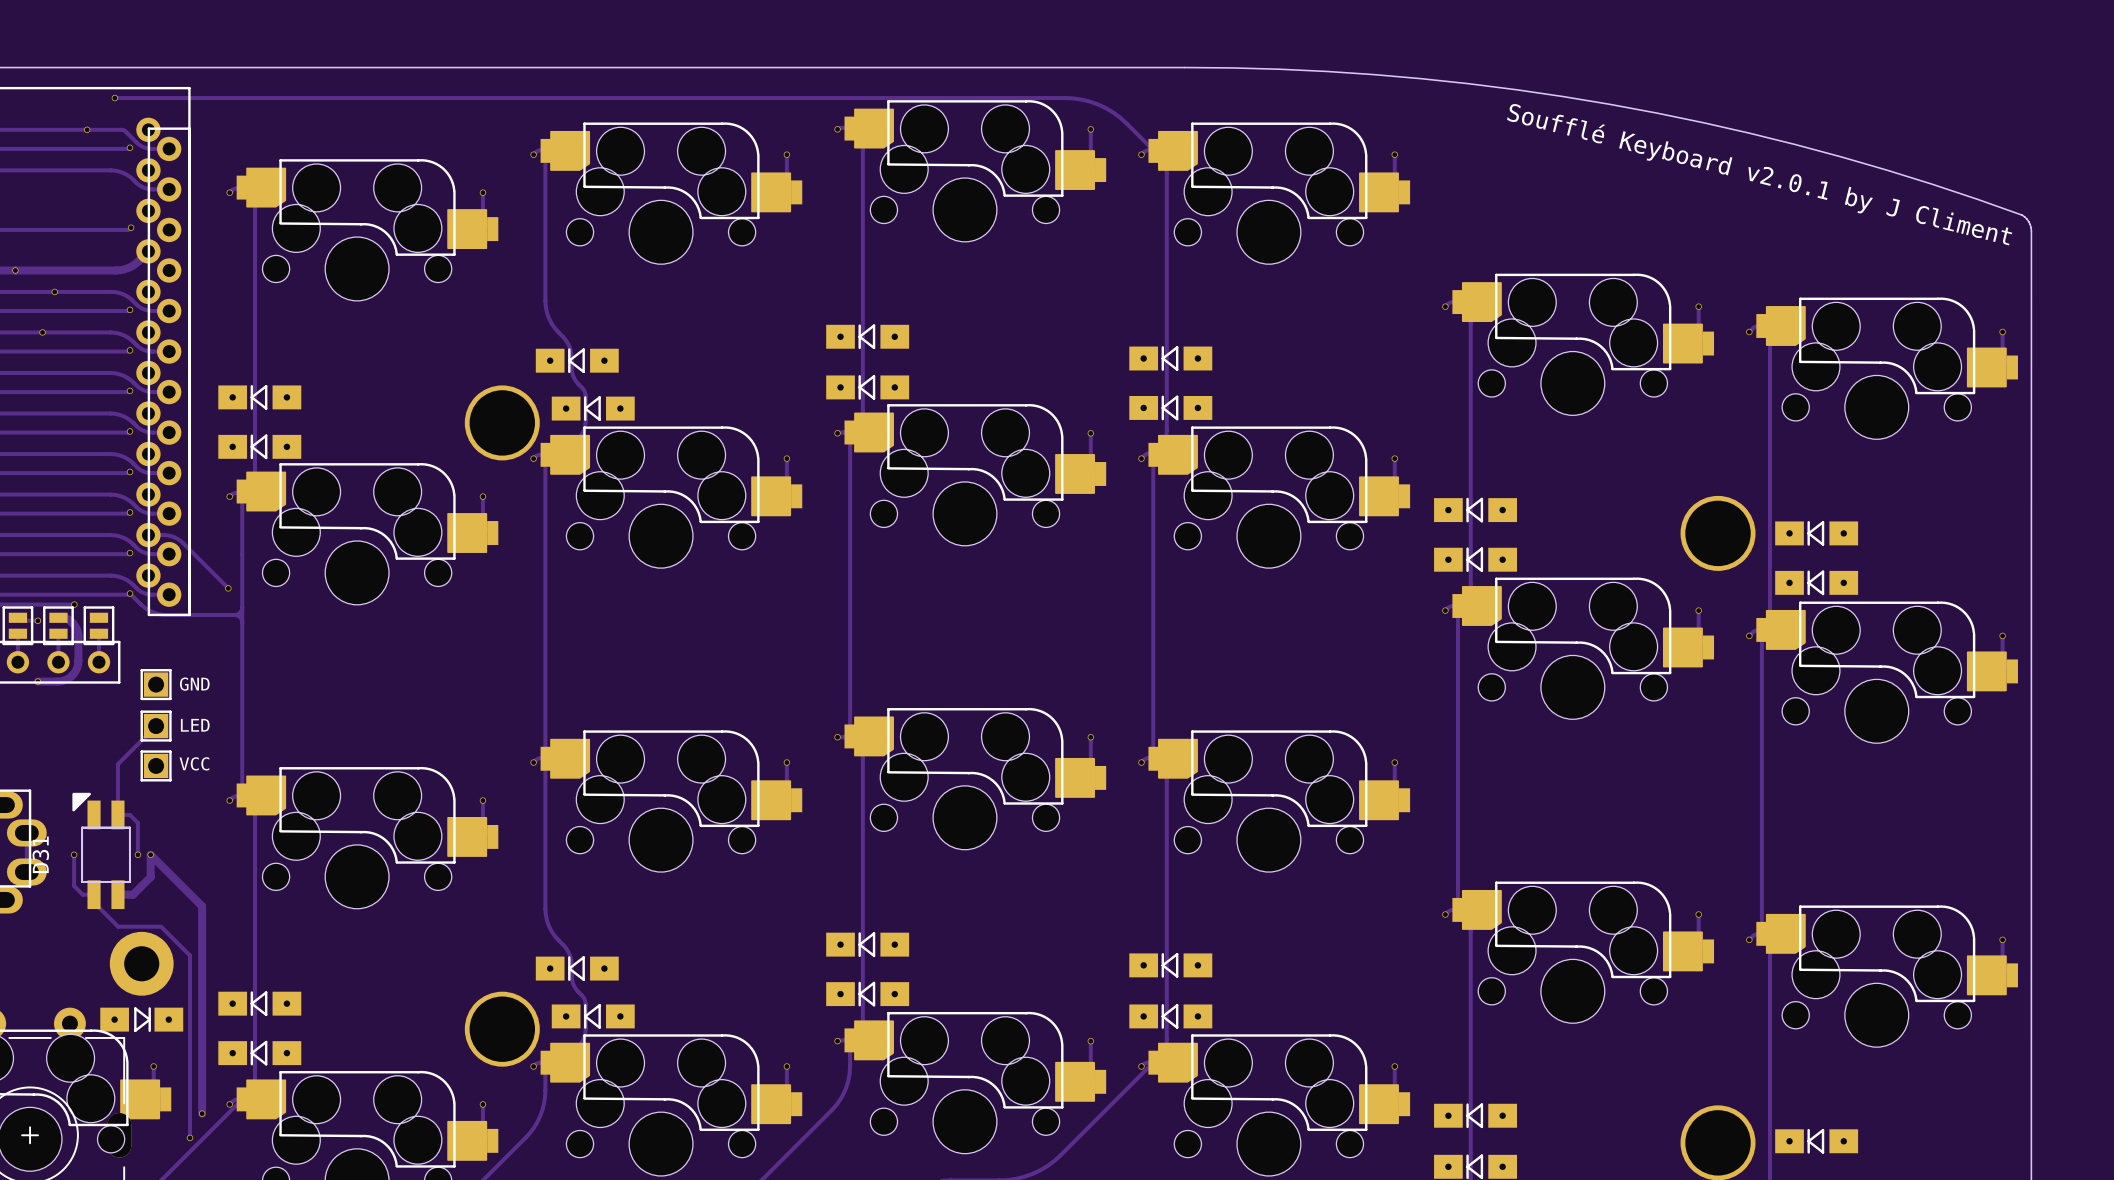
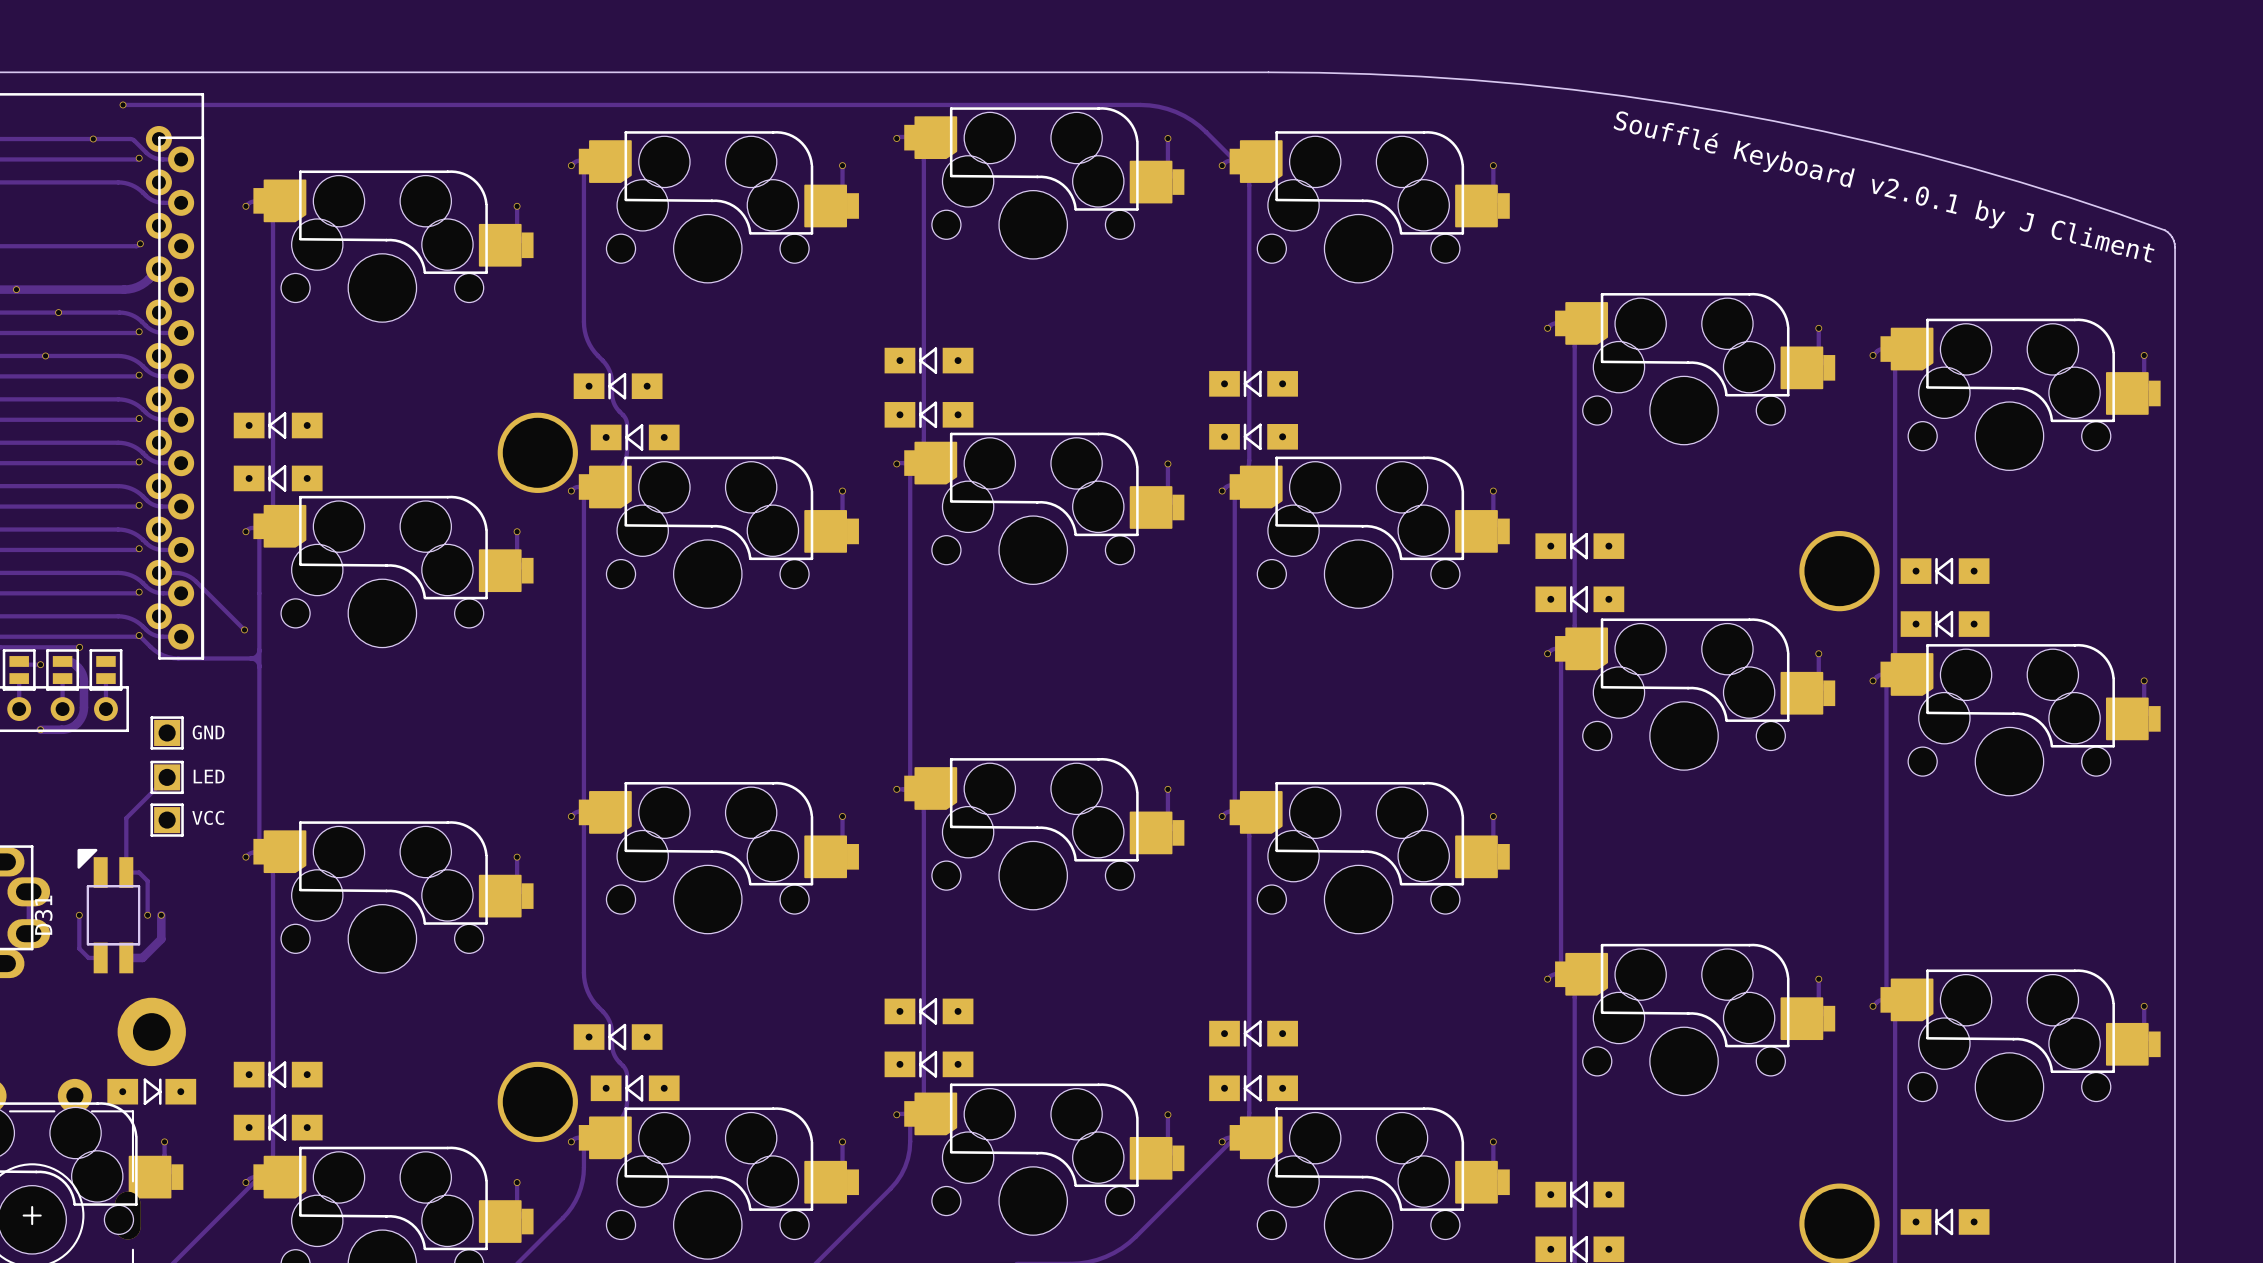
track: (150, 854) (202, 906) (202, 1113) -> none
track: (94, 894) (94, 902) (118, 926) (161, 926) (189, 955) (189, 1137) -> none
via: (202, 1113) -> none
via: (189, 1137) -> none

